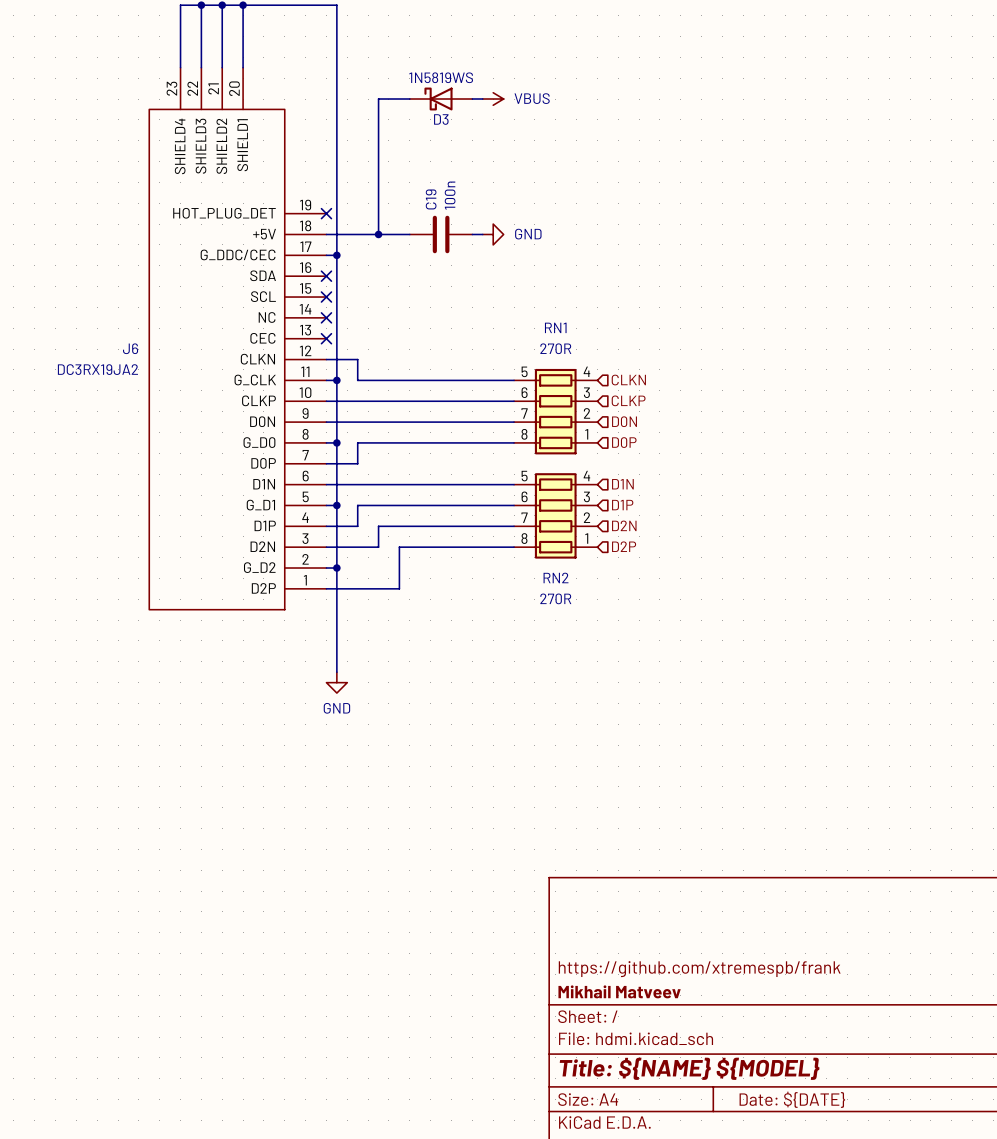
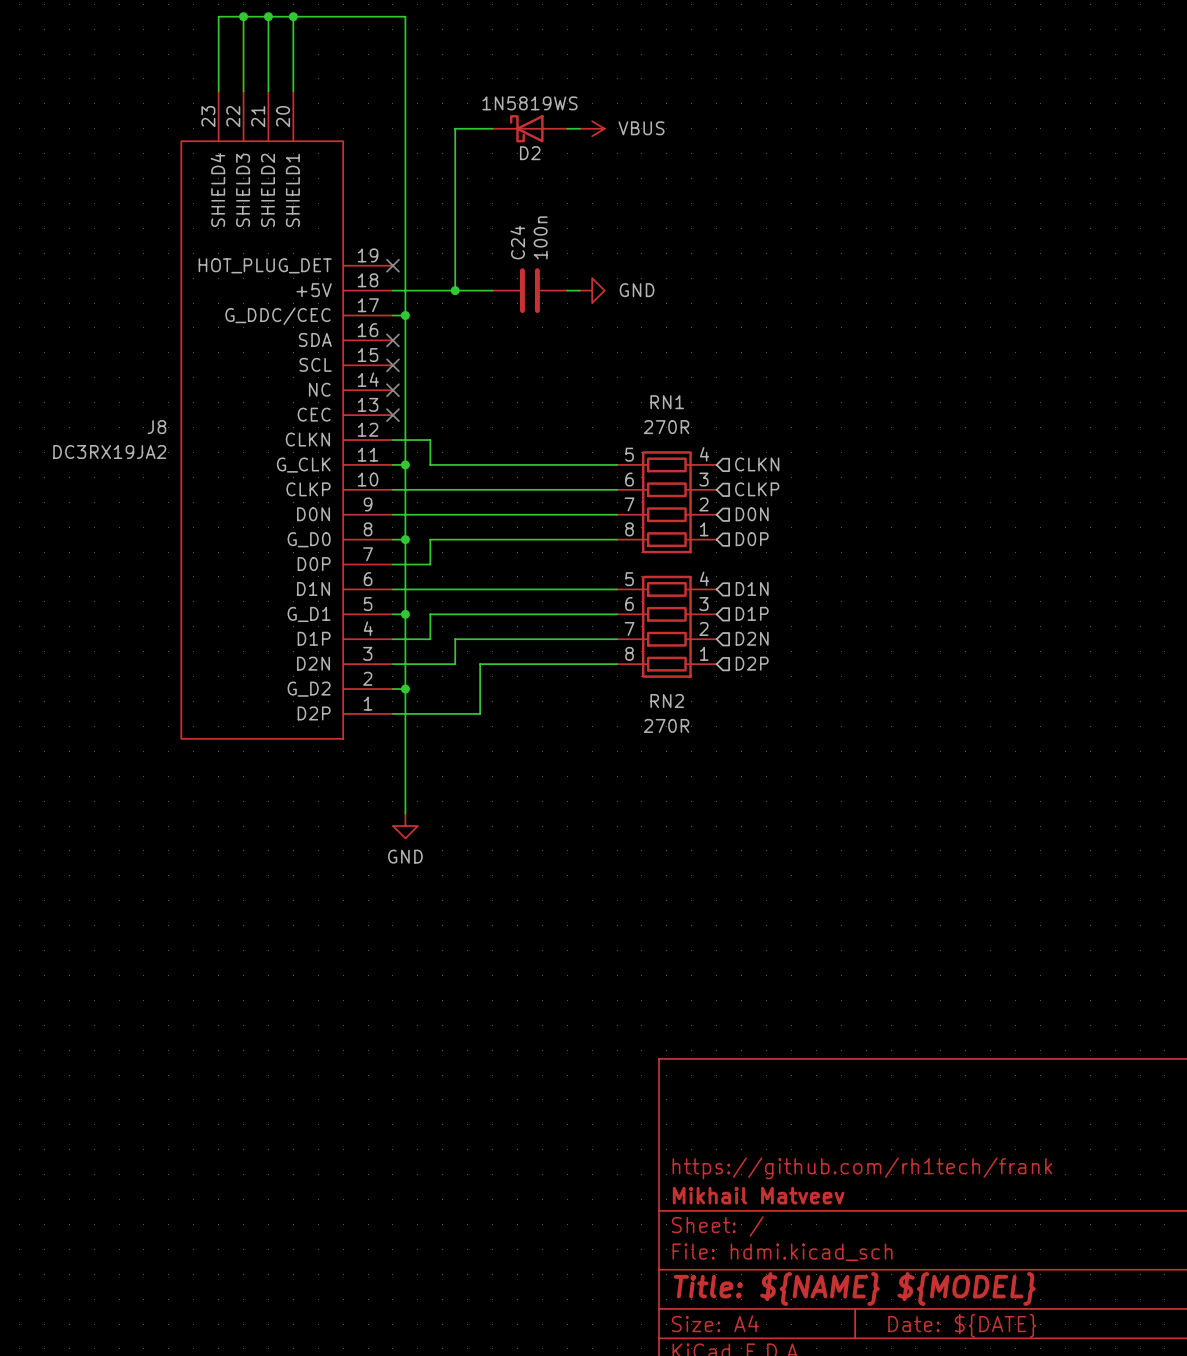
D3 name: D3 (441, 119) -> D2 (530, 153)
C19 name: C19 (431, 199) -> C24 (517, 242)
J6 name: J6 (130, 348) -> J8 (156, 427)
title block: https://github.com/xtremespb/frank (699, 969) -> https://github.com/rh1tech/frank (862, 1168)

